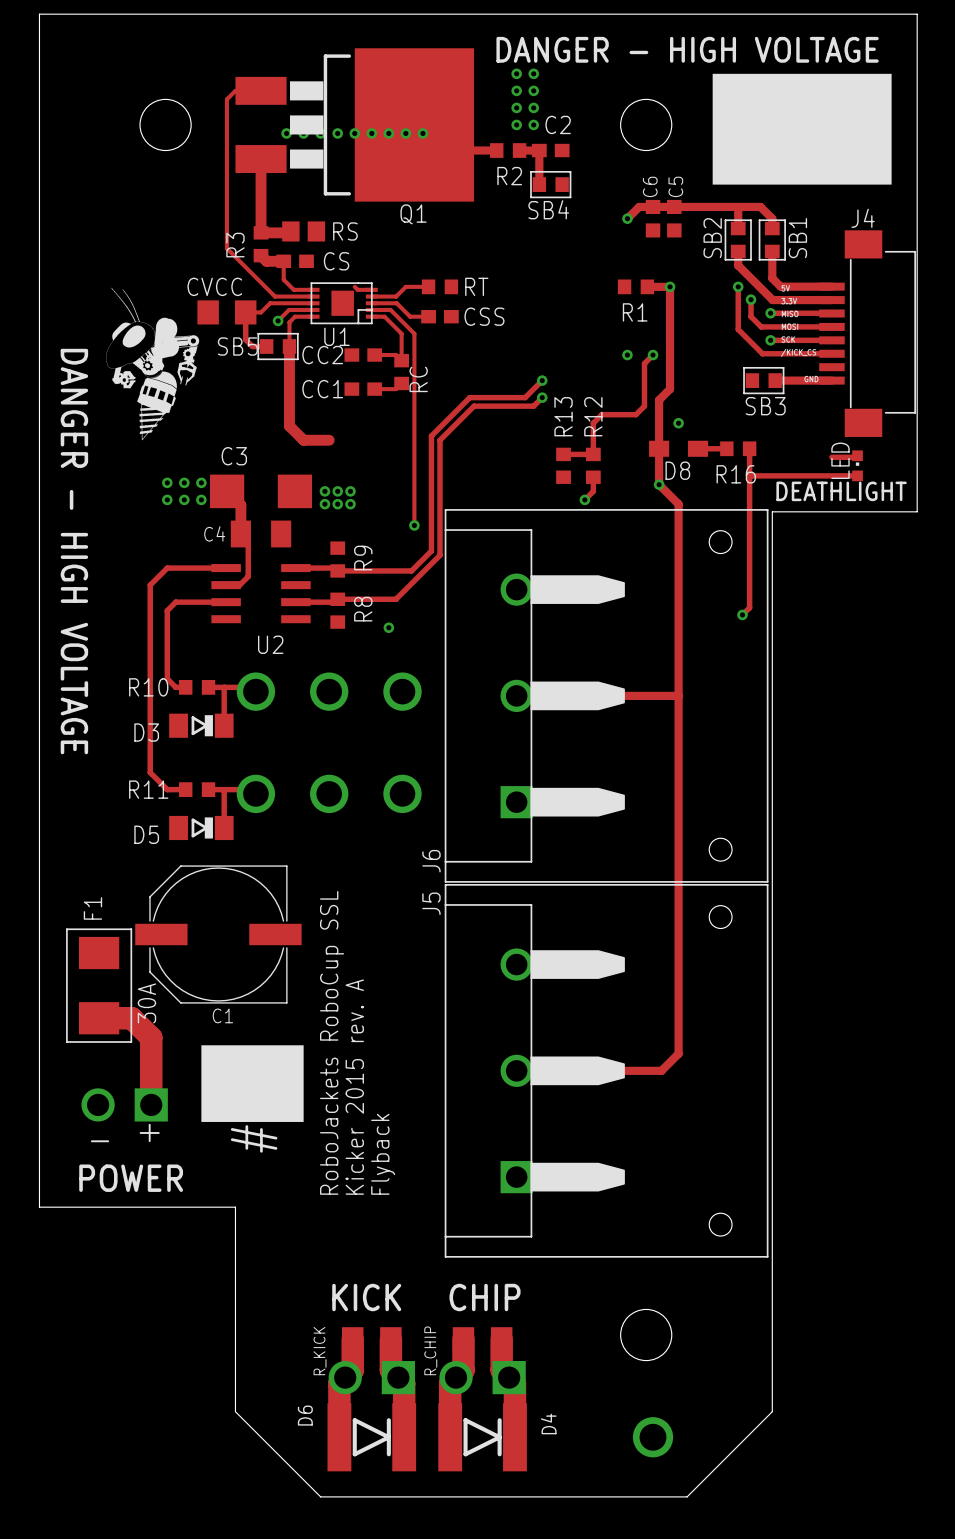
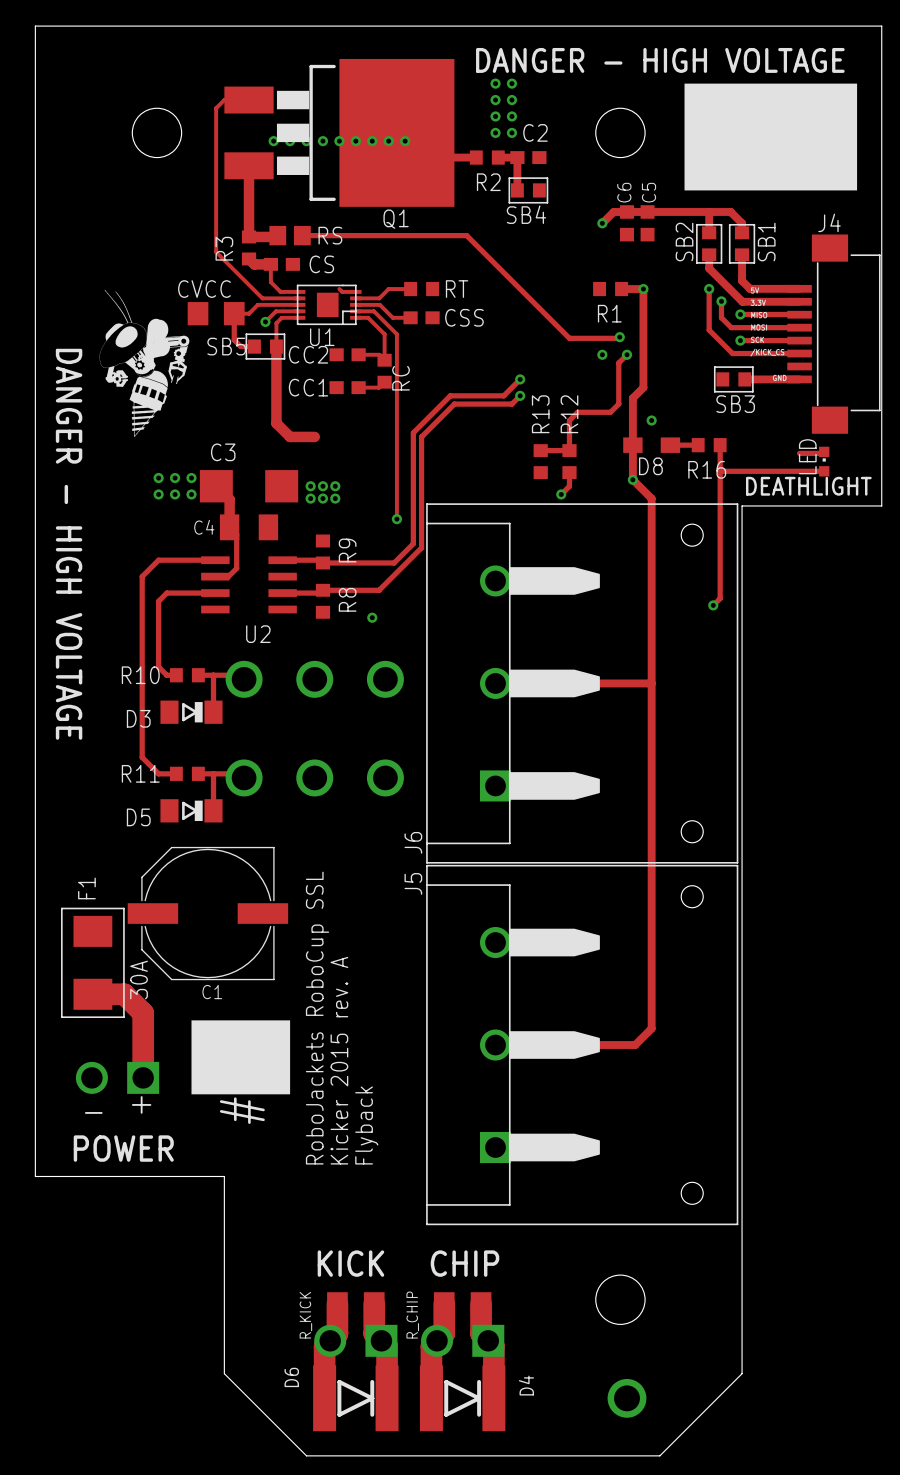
track: none -> (302, 235) (466, 235) (569, 338) (619, 337)
via: none -> (619, 337)

